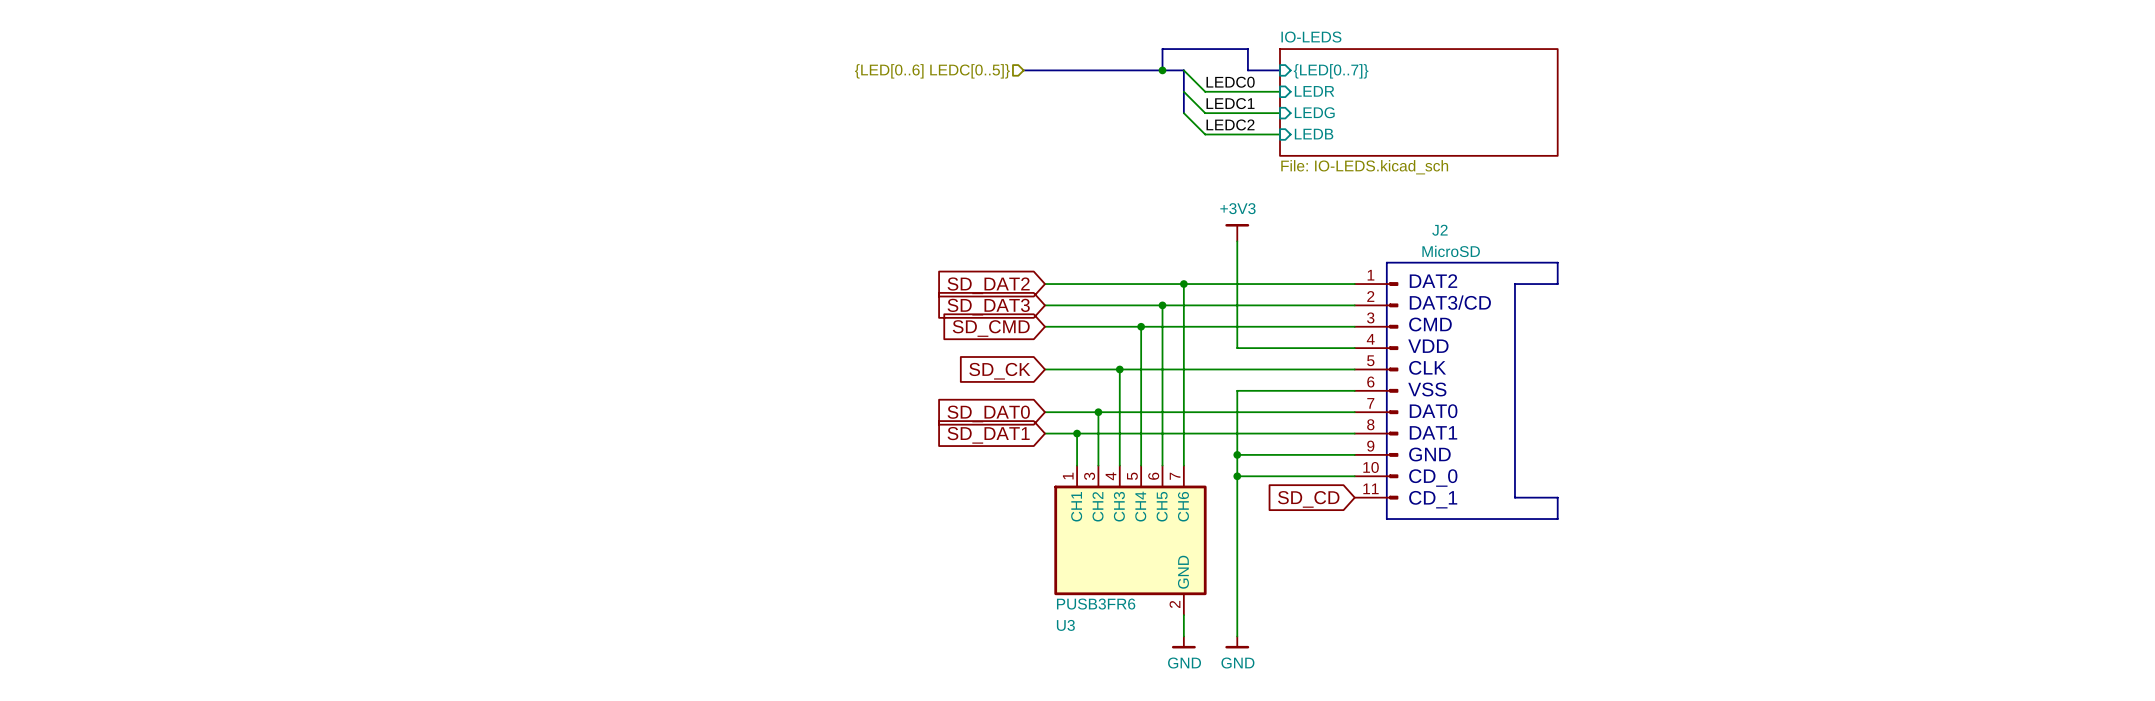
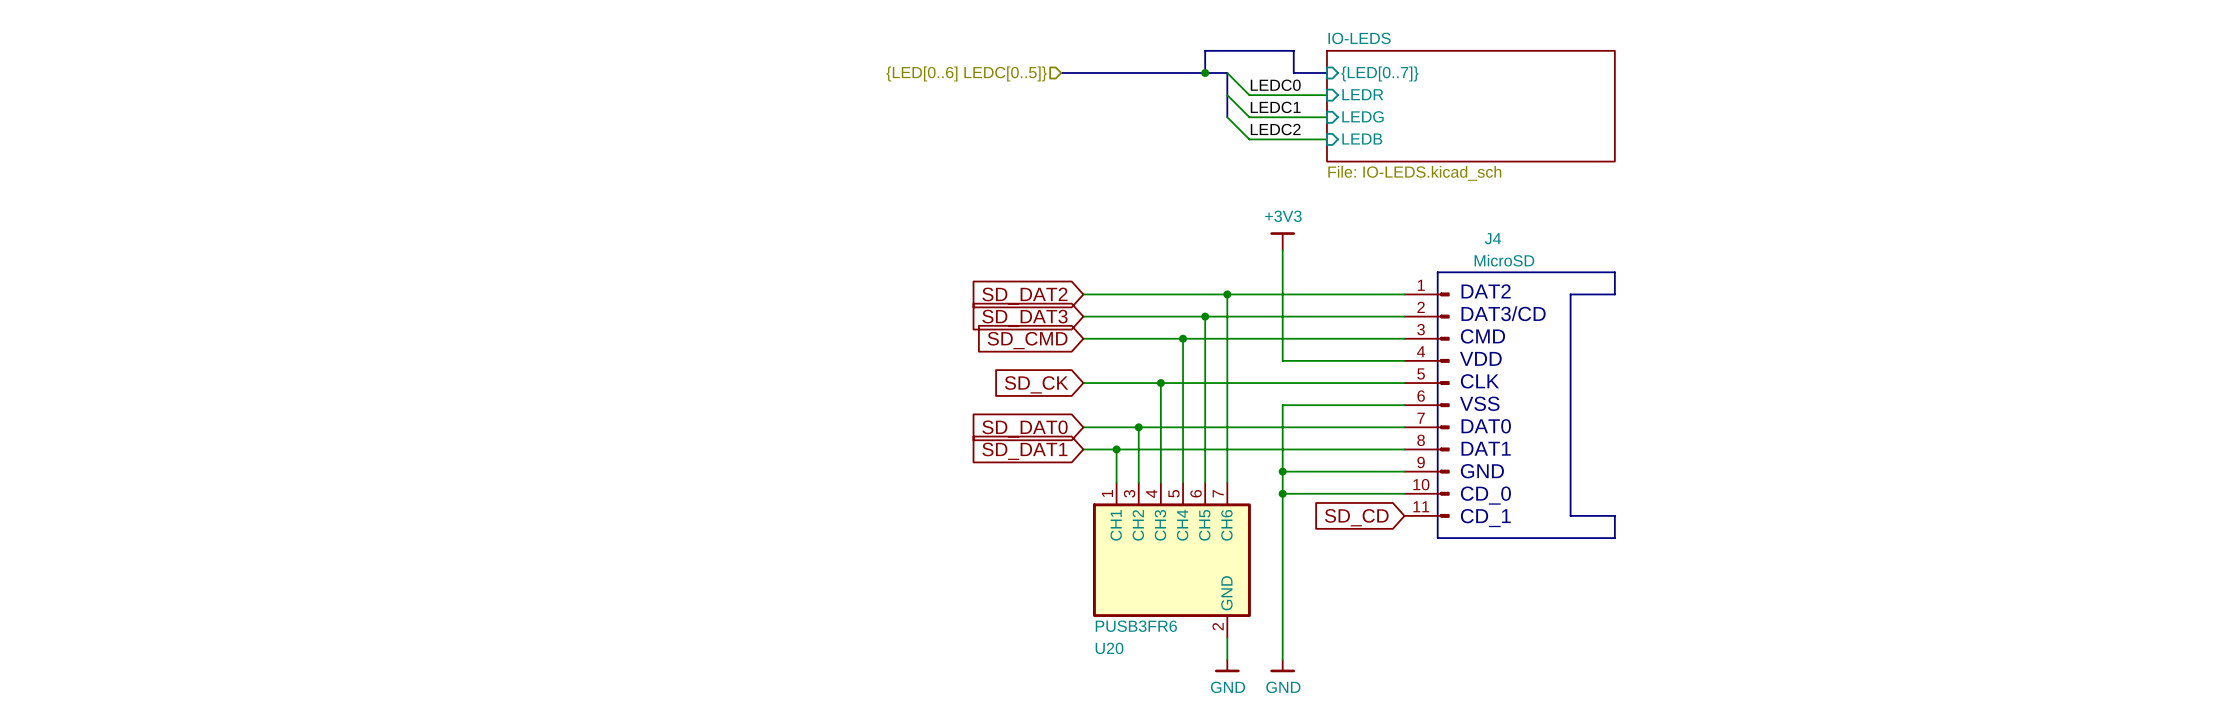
J2 name: J2 (1439, 230) -> J4 (1492, 238)
U3 name: U3 (1065, 625) -> U20 (1109, 648)

